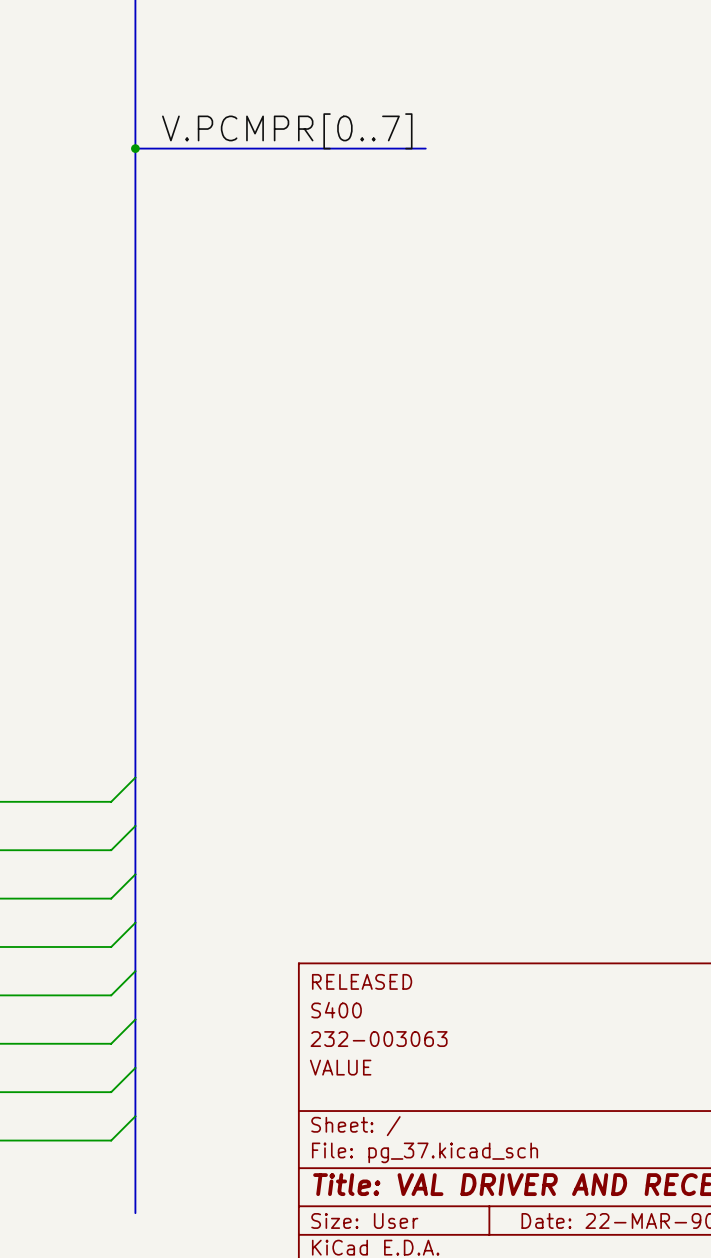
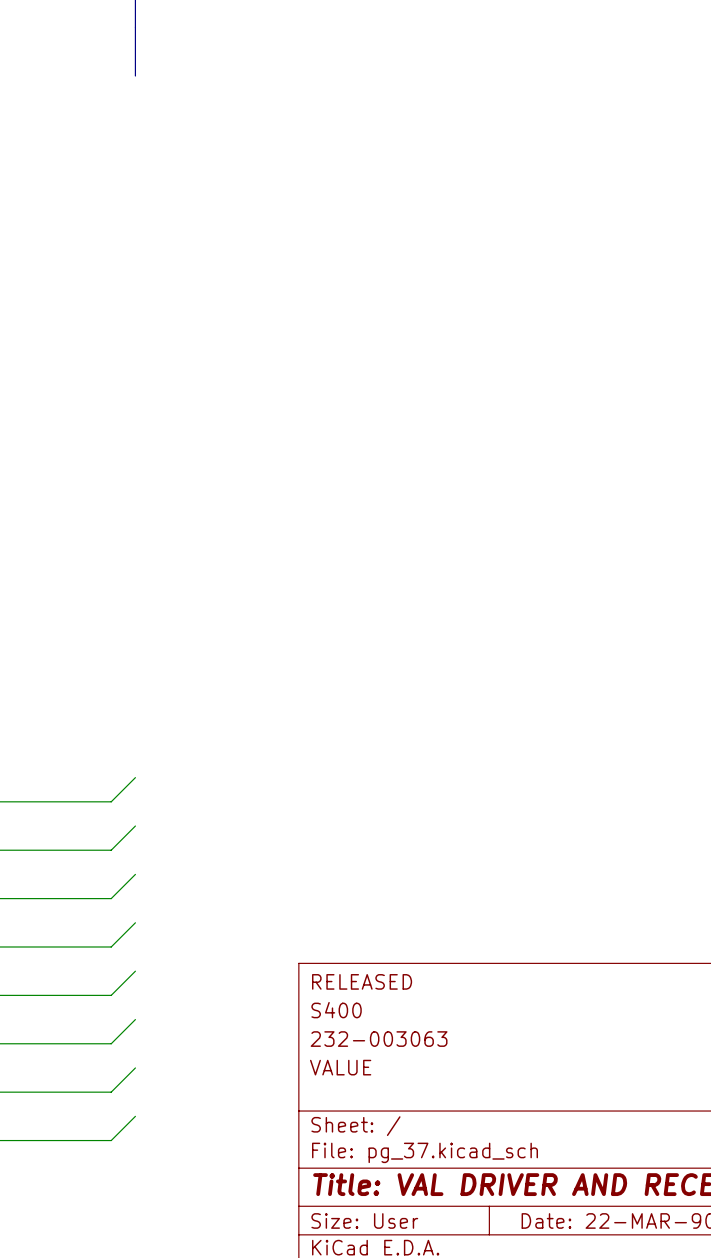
bus: (135, 76) (135, 1213) -> none
label: V.PCMPR[0..7] (287, 131) -> none
bus: (135, 148) (425, 148) -> none
junction: (135, 148) -> none

